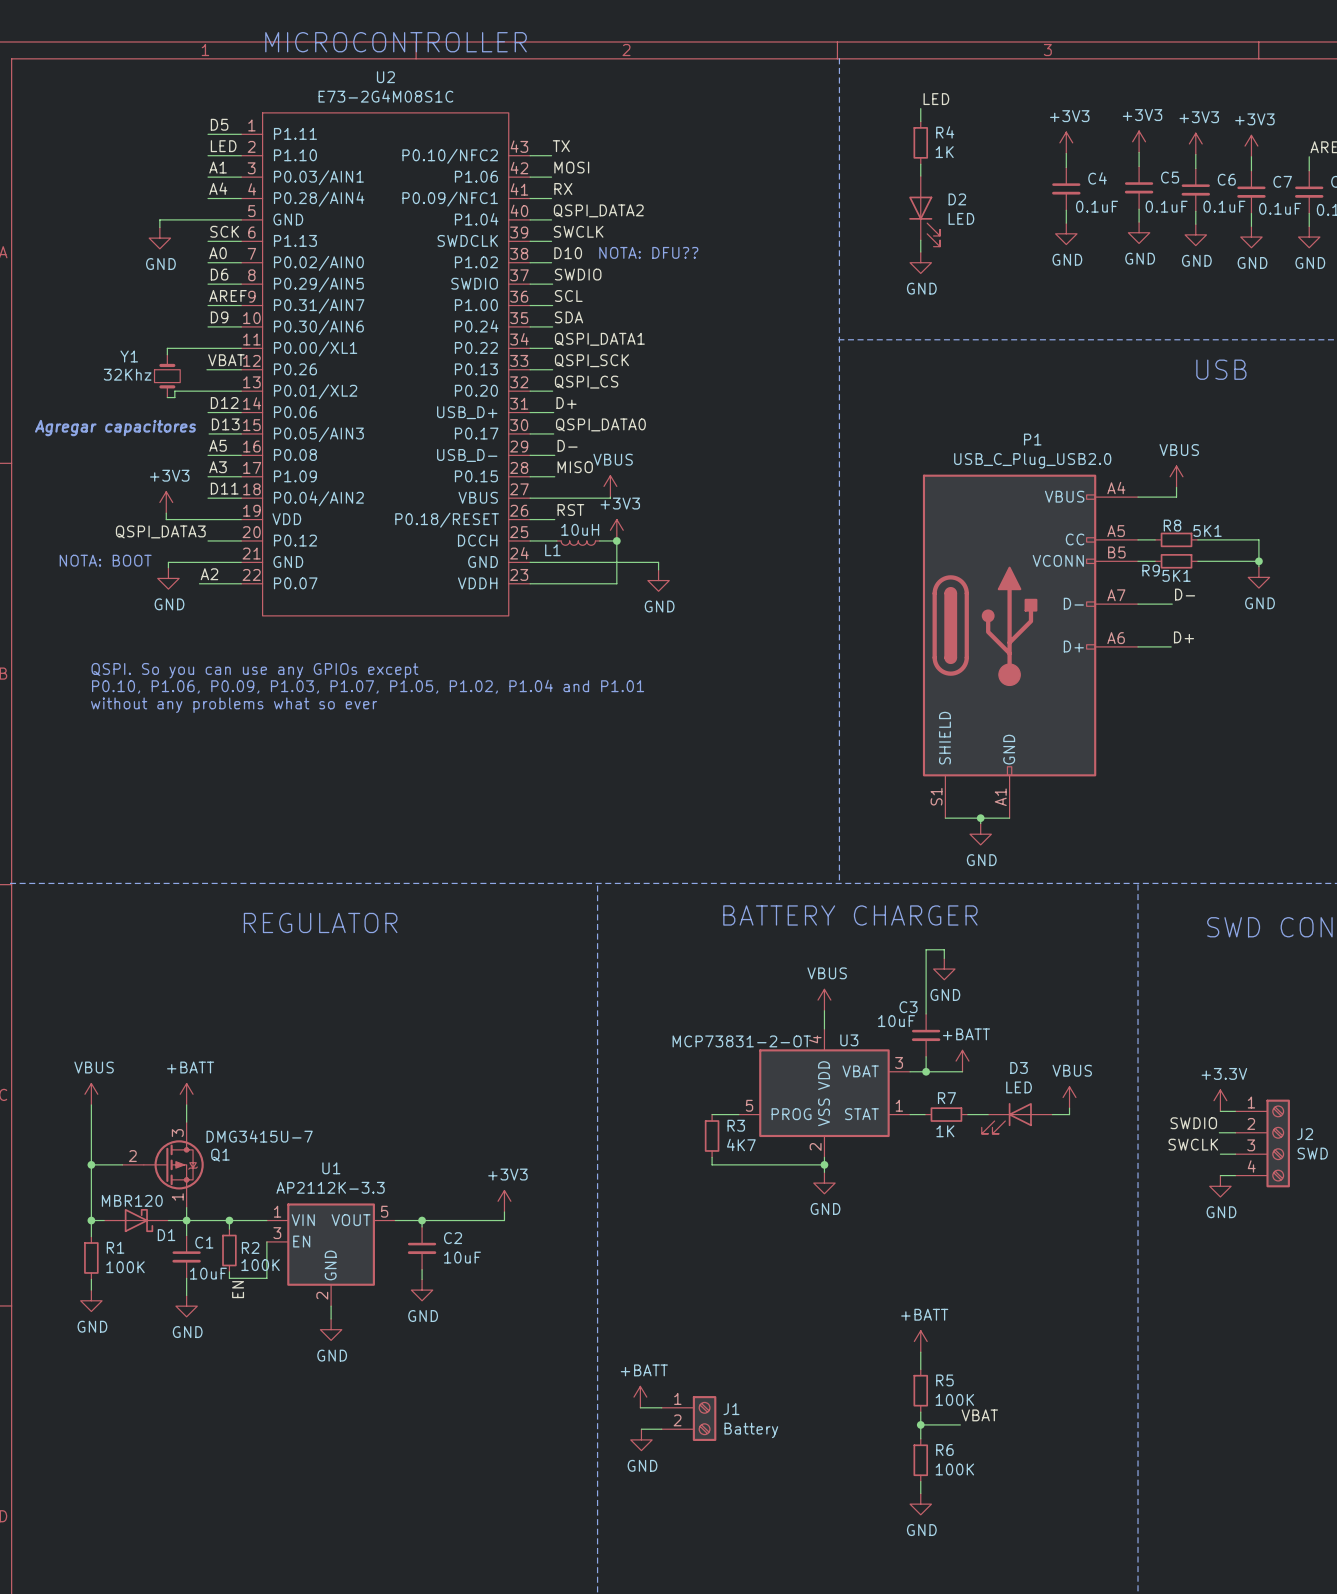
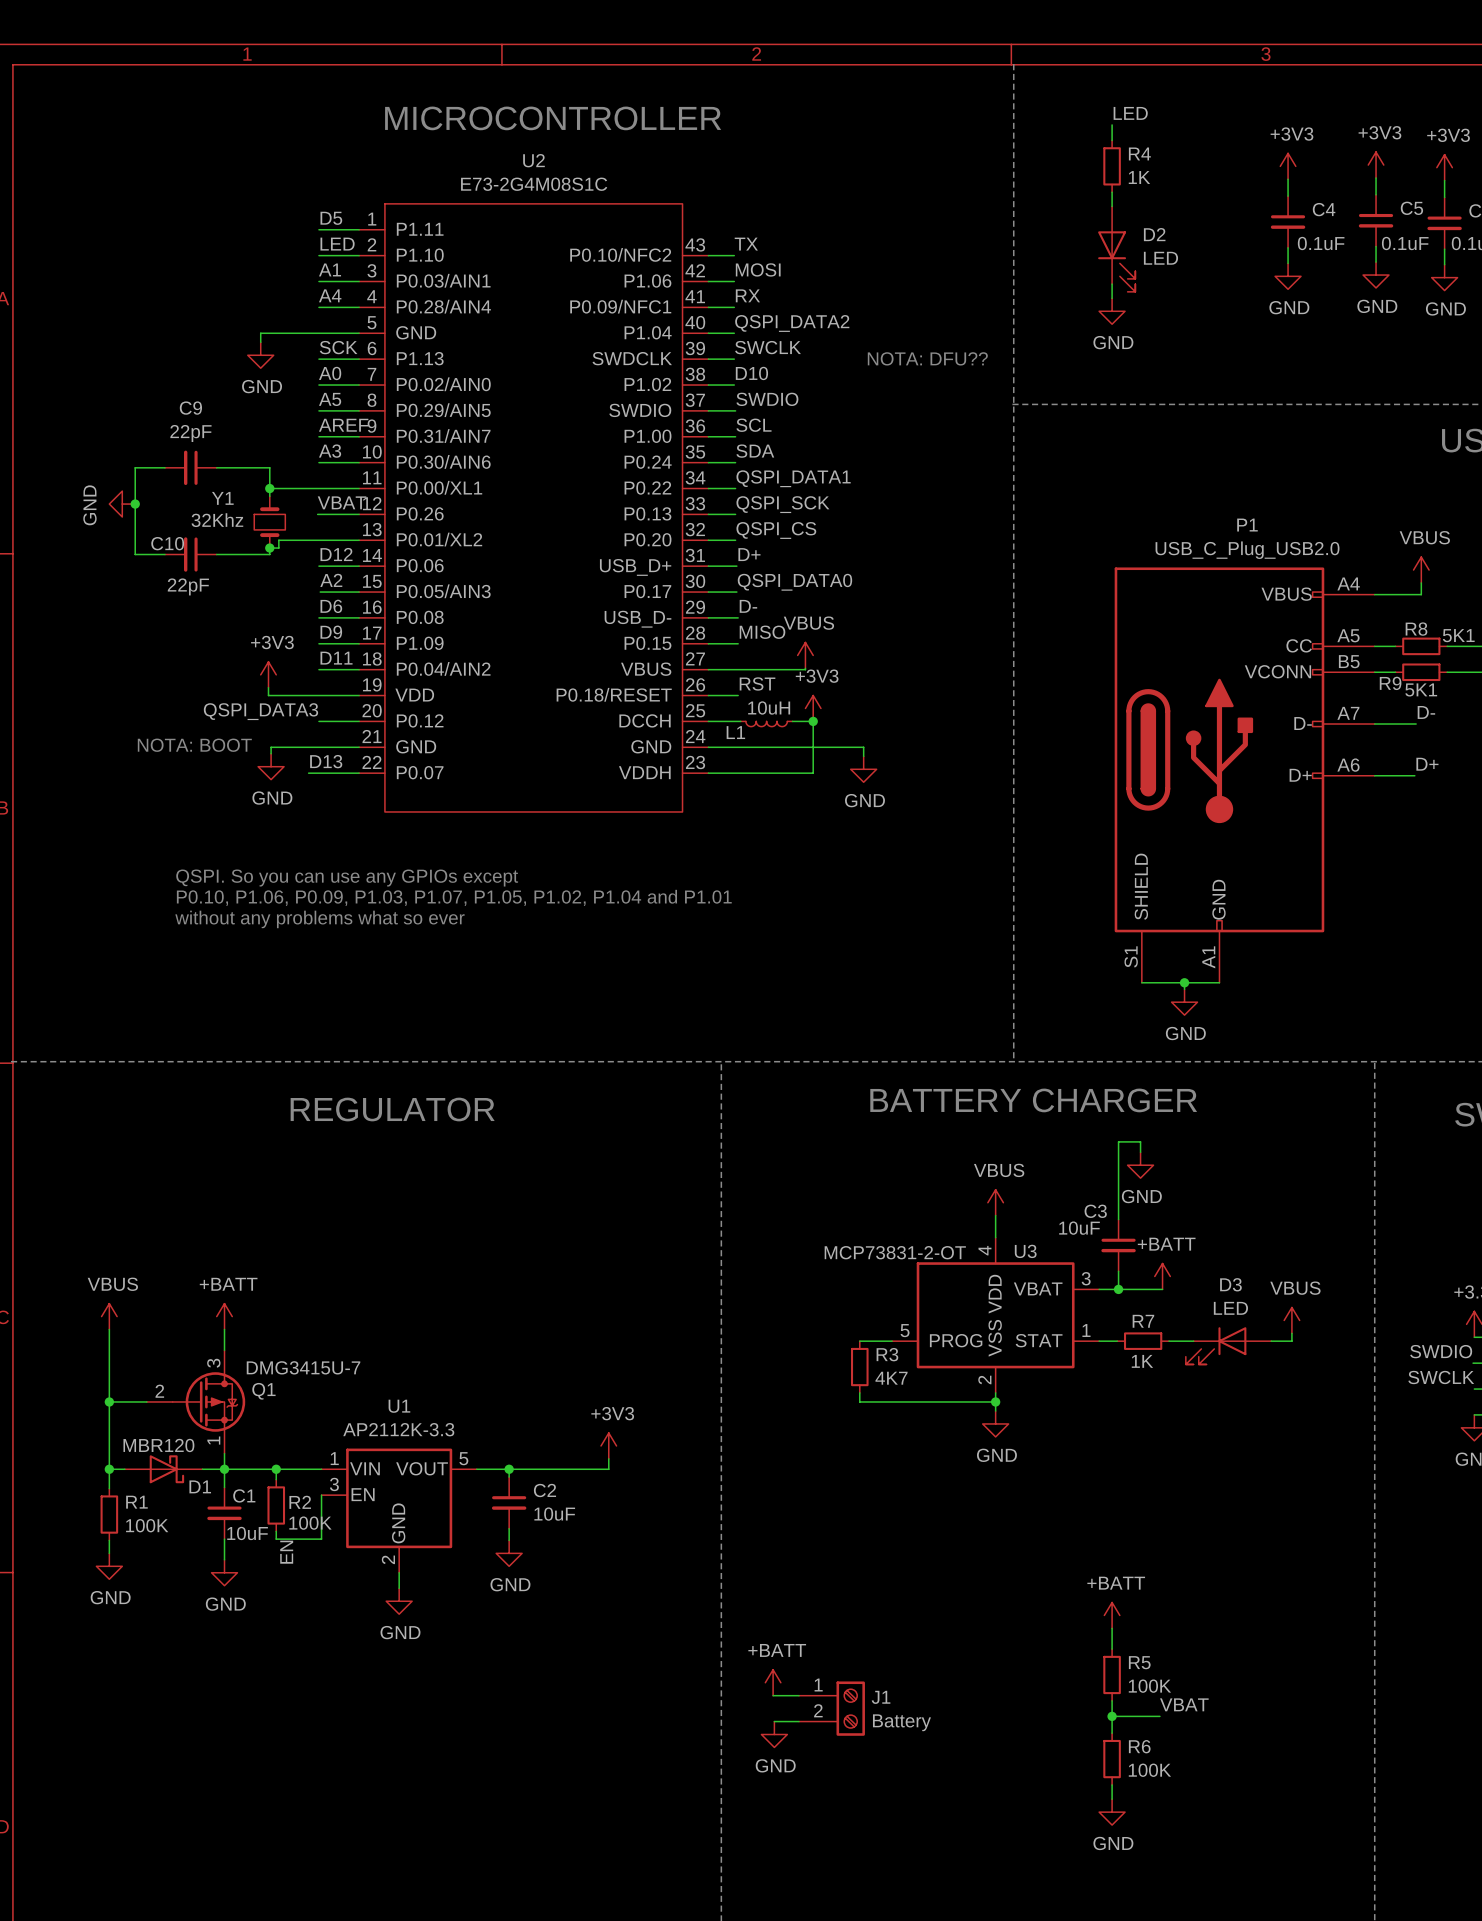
text position: MICROCONTROLLER (396, 42) -> MICROCONTROLLER (553, 118)
label position: D5 (219, 124) -> D5 (331, 218)
wire: (208, 134) (241, 134) -> (318, 229) (359, 229)
label position: LED (223, 146) -> LED (337, 244)
label position: TX (561, 146) -> TX (746, 244)
wire: (208, 155) (241, 155) -> (318, 255) (359, 255)
wire: (530, 155) (551, 155) -> (708, 255) (734, 255)
label position: A1 (218, 167) -> A1 (330, 269)
label position: MOSI (571, 167) -> MOSI (758, 269)
wire: (208, 177) (241, 177) -> (318, 281) (359, 281)
wire: (530, 177) (551, 177) -> (708, 281) (734, 281)
label position: A4 (218, 188) -> A4 (330, 295)
label position: RX (563, 188) -> RX (747, 295)
wire: (208, 198) (241, 198) -> (318, 307) (359, 307)
wire: (530, 198) (551, 198) -> (708, 307) (734, 307)
label position: QSPI_DATA2 (598, 210) -> QSPI_DATA2 (792, 323)
wire: (241, 219) (159, 219) (159, 227) -> (359, 333) (260, 333) (260, 342)
wire: (530, 219) (551, 219) -> (708, 333) (734, 333)
label position: SCK (224, 231) -> SCK (338, 347)
label position: SWCLK (578, 231) -> SWCLK (768, 347)
power symbol position: GND (159, 238) -> GND (260, 355)
wire: (208, 241) (241, 241) -> (318, 359) (359, 359)
wire: (530, 241) (551, 241) -> (708, 359) (734, 359)
text position: NOTA: DFU?? (648, 252) -> NOTA: DFU?? (927, 358)
label position: A0 (218, 253) -> A0 (330, 373)
label position: D10 (568, 253) -> D10 (751, 373)
wire: (208, 262) (241, 262) -> (318, 385) (359, 385)
wire: (530, 262) (551, 262) -> (708, 385) (734, 385)
label: D6 (219, 274) -> none
label position: SWDIO (578, 274) -> SWDIO (767, 399)
wire: (208, 284) (241, 284) -> (318, 410) (359, 410)
wire: (530, 284) (552, 284) -> (708, 410) (735, 410)
label position: AREF (227, 295) -> AREF (343, 425)
label position: SCL (568, 295) -> SCL (753, 425)
wire: (208, 305) (241, 305) -> (318, 436) (359, 436)
wire: (530, 305) (552, 305) -> (708, 436) (735, 436)
label: D9 (219, 317) -> none
label position: SDA (569, 317) -> SDA (755, 451)
wire: (208, 326) (241, 326) -> (318, 462) (359, 462)
wire: (530, 326) (552, 326) -> (708, 462) (735, 462)
label position: QSPI_DATA1 (599, 339) -> QSPI_DATA1 (793, 478)
wire: (241, 348) (167, 348) (167, 354) -> none
wire: (530, 348) (552, 348) -> (708, 488) (735, 488)
label position: VBAT (226, 360) -> VBAT (342, 502)
label position: QSPI_SCK (591, 360) -> QSPI_SCK (782, 504)
U2 position: (385, 364) -> (533, 507)
wire: (206, 369) (241, 369) -> (317, 514) (359, 514)
wire: (530, 369) (552, 369) -> (708, 514) (735, 514)
Y1 position: (167, 376) -> (269, 522)
label position: QSPI_CS (586, 382) -> QSPI_CS (776, 530)
wire: (241, 391) (174, 391) (174, 397) (167, 397) -> none
wire: (530, 391) (552, 391) -> (708, 540) (735, 540)
wire: none -> (164, 467) (135, 467) (135, 554) (164, 554)
C9: none -> 22pF (190, 467)
label position: D12 (224, 403) -> D12 (336, 554)
label position: D+ (566, 403) -> D+ (749, 554)
wire: none -> (269, 488) (359, 488)
junction: none -> (269, 488)
wire: (208, 412) (241, 412) -> (318, 566) (359, 566)
wire: (530, 412) (553, 412) -> (708, 566) (736, 566)
power symbol: none -> GND (122, 504)
junction: none -> (135, 504)
label: D13 (225, 424) -> none
label position: QSPI_DATA0 (600, 424) -> QSPI_DATA0 (794, 582)
text: Agregar capacitores (115, 428) -> none
wire: (209, 433) (241, 433) -> (320, 592) (359, 592)
wire: (530, 433) (553, 433) -> (708, 592) (736, 592)
label position: A5 (218, 445) -> A5 (330, 399)
label position: D- (567, 445) -> D- (748, 606)
wire: none -> (359, 540) (278, 540) (278, 548) (269, 548) (269, 554) (216, 554)
wire: (208, 455) (241, 455) -> (318, 617) (359, 617)
wire: (530, 455) (554, 455) -> (708, 617) (738, 617)
junction: none -> (269, 548)
C10: none -> 22pF (190, 554)
label position: A3 (218, 467) -> A3 (330, 451)
label position: MISO (575, 467) -> MISO (762, 632)
wire: (208, 476) (241, 476) -> (318, 643) (359, 643)
wire: (530, 476) (554, 476) -> (708, 643) (738, 643)
power symbol position: VBUS (610, 486) -> VBUS (805, 655)
label position: D11 (224, 488) -> D11 (336, 658)
wire: (610, 497) (530, 498) -> (805, 668) (708, 669)
wire: (208, 498) (241, 498) -> (318, 669) (359, 669)
power symbol position: +3V3 (166, 502) -> +3V3 (268, 674)
label: none -> D6 (331, 606)
label position: RST (570, 510) -> RST (757, 683)
wire: (166, 513) (166, 519) (241, 519) -> (268, 687) (268, 695) (359, 695)
wire: (530, 519) (554, 519) -> (708, 695) (738, 695)
label: none -> D9 (331, 632)
power symbol position: +3V3 (616, 530) -> +3V3 (813, 708)
label position: QSPI_DATA3 (160, 531) -> QSPI_DATA3 (260, 711)
wire: (208, 540) (241, 540) -> (318, 721) (359, 721)
wire: (530, 540) (556, 540) -> (708, 721) (740, 721)
wire: (599, 540) (616, 540) (616, 583) (530, 583) -> (792, 721) (813, 721) (813, 773) (708, 773)
junction: (616, 540) -> none
L1 position: (578, 543) -> (766, 724)
text position: NOTA: BOOT (105, 560) -> NOTA: BOOT (194, 745)
wire: (241, 562) (168, 562) (168, 567) -> (359, 747) (271, 747) (271, 753)
wire: (530, 562) (658, 562) (658, 569) -> (708, 747) (863, 747) (863, 756)
label position: A2 (209, 574) -> A2 (331, 580)
power symbol position: GND (168, 578) -> GND (271, 766)
power symbol position: GND (658, 580) -> GND (863, 769)
wire: (199, 583) (241, 583) -> (308, 773) (359, 773)
junction: none -> (813, 721)
label: none -> D13 (326, 761)
text position: QSPI. So you can use any GPIOs except (254, 670) -> QSPI. So you can use any GPIOs except (347, 878)
text position: P0.10, P1.06, P0.09, P1.03, P1.07, P1.05, P1.02, P1.04 and P1.01 (368, 686) -> P0.10, P1.06, P0.09, P1.03, P1.07, P1.05, P1.02, P1.04 and P1.01 (454, 897)
text position: without any problems what so ever (234, 705) -> without any problems what so ever (319, 919)

